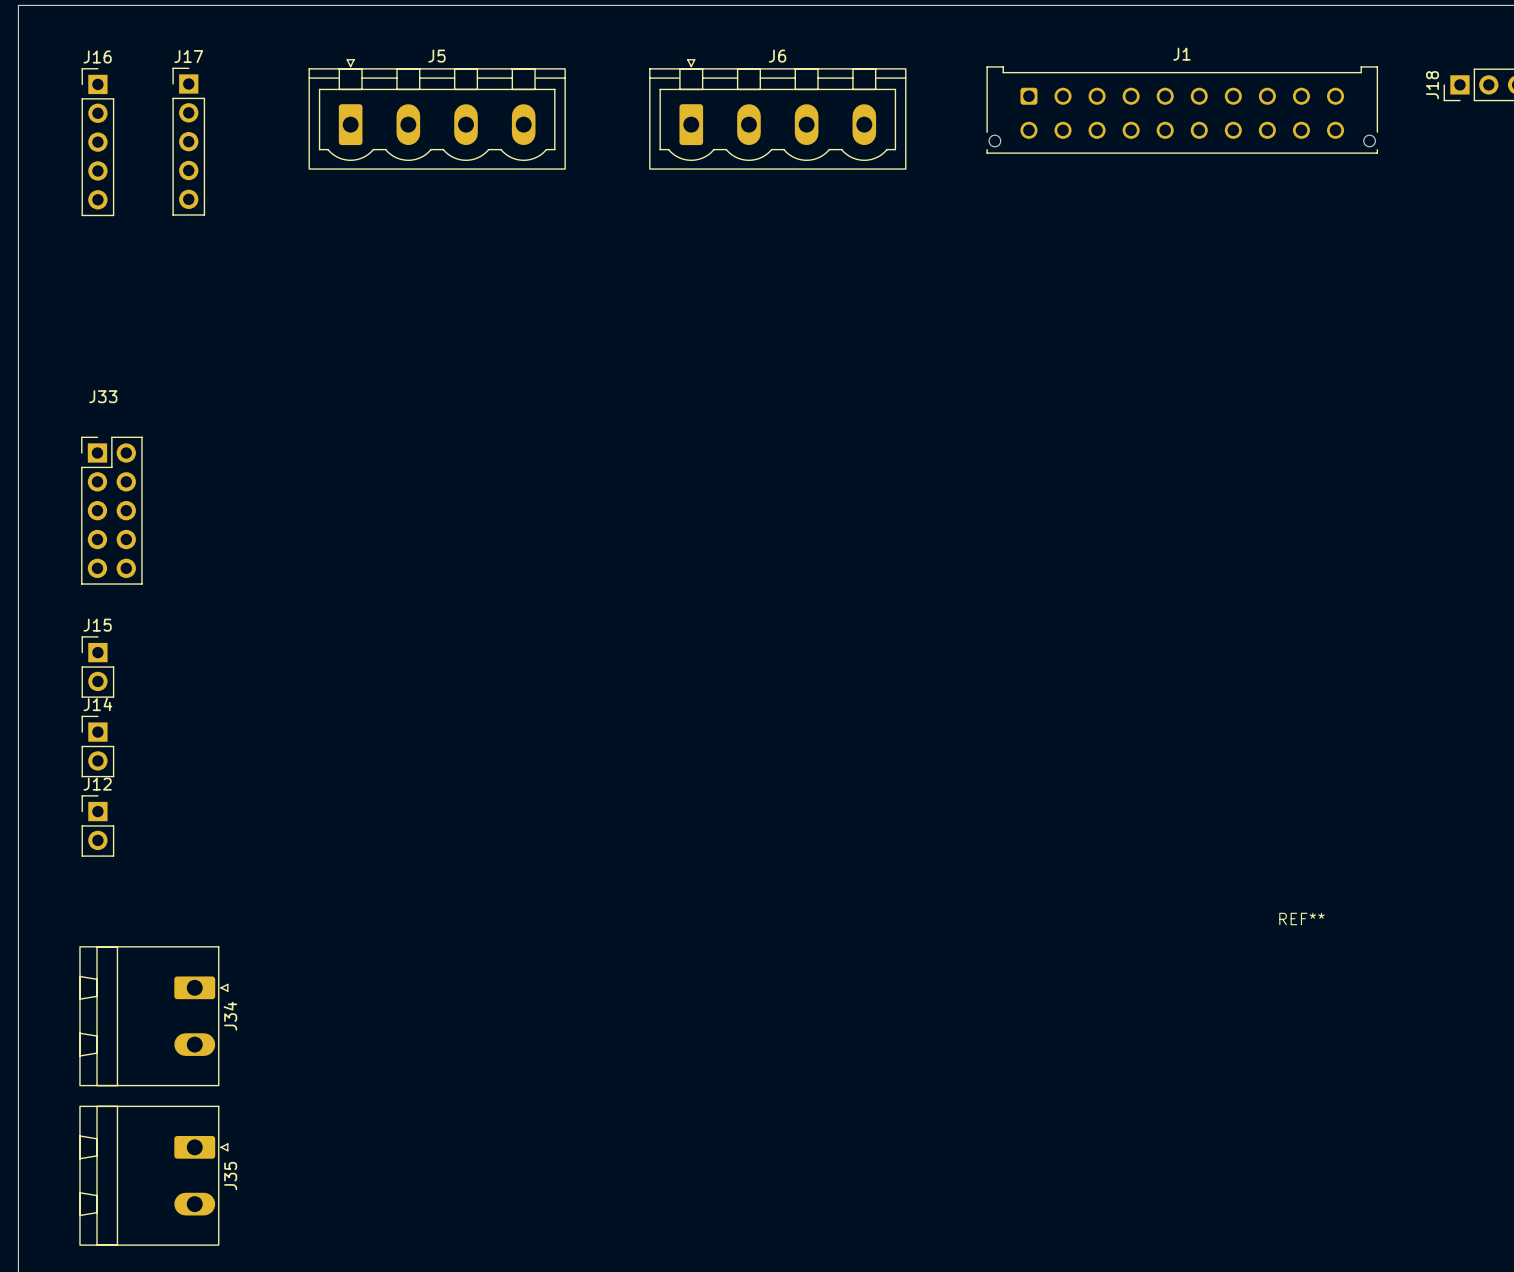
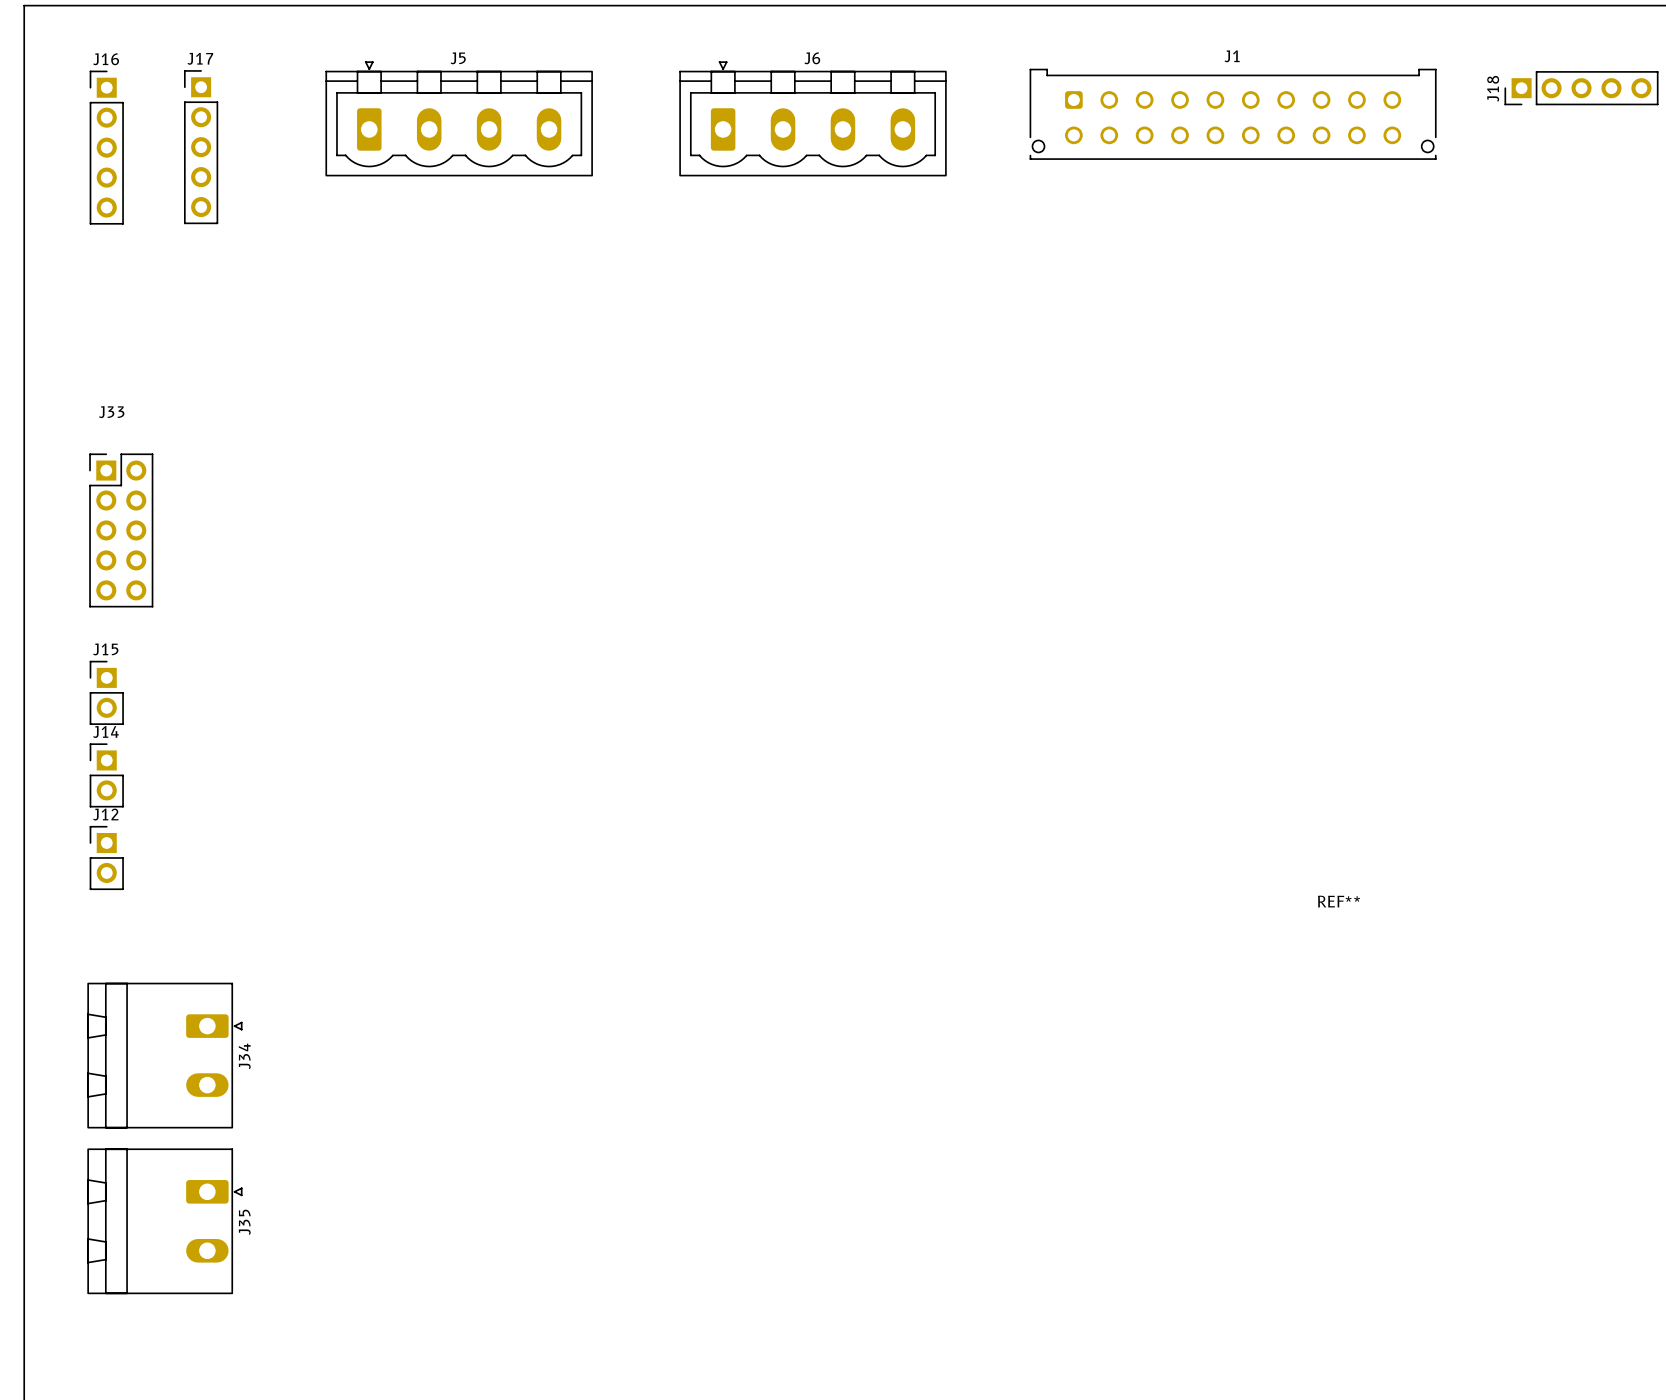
REF** position: (1301, 918) -> (1339, 901)

